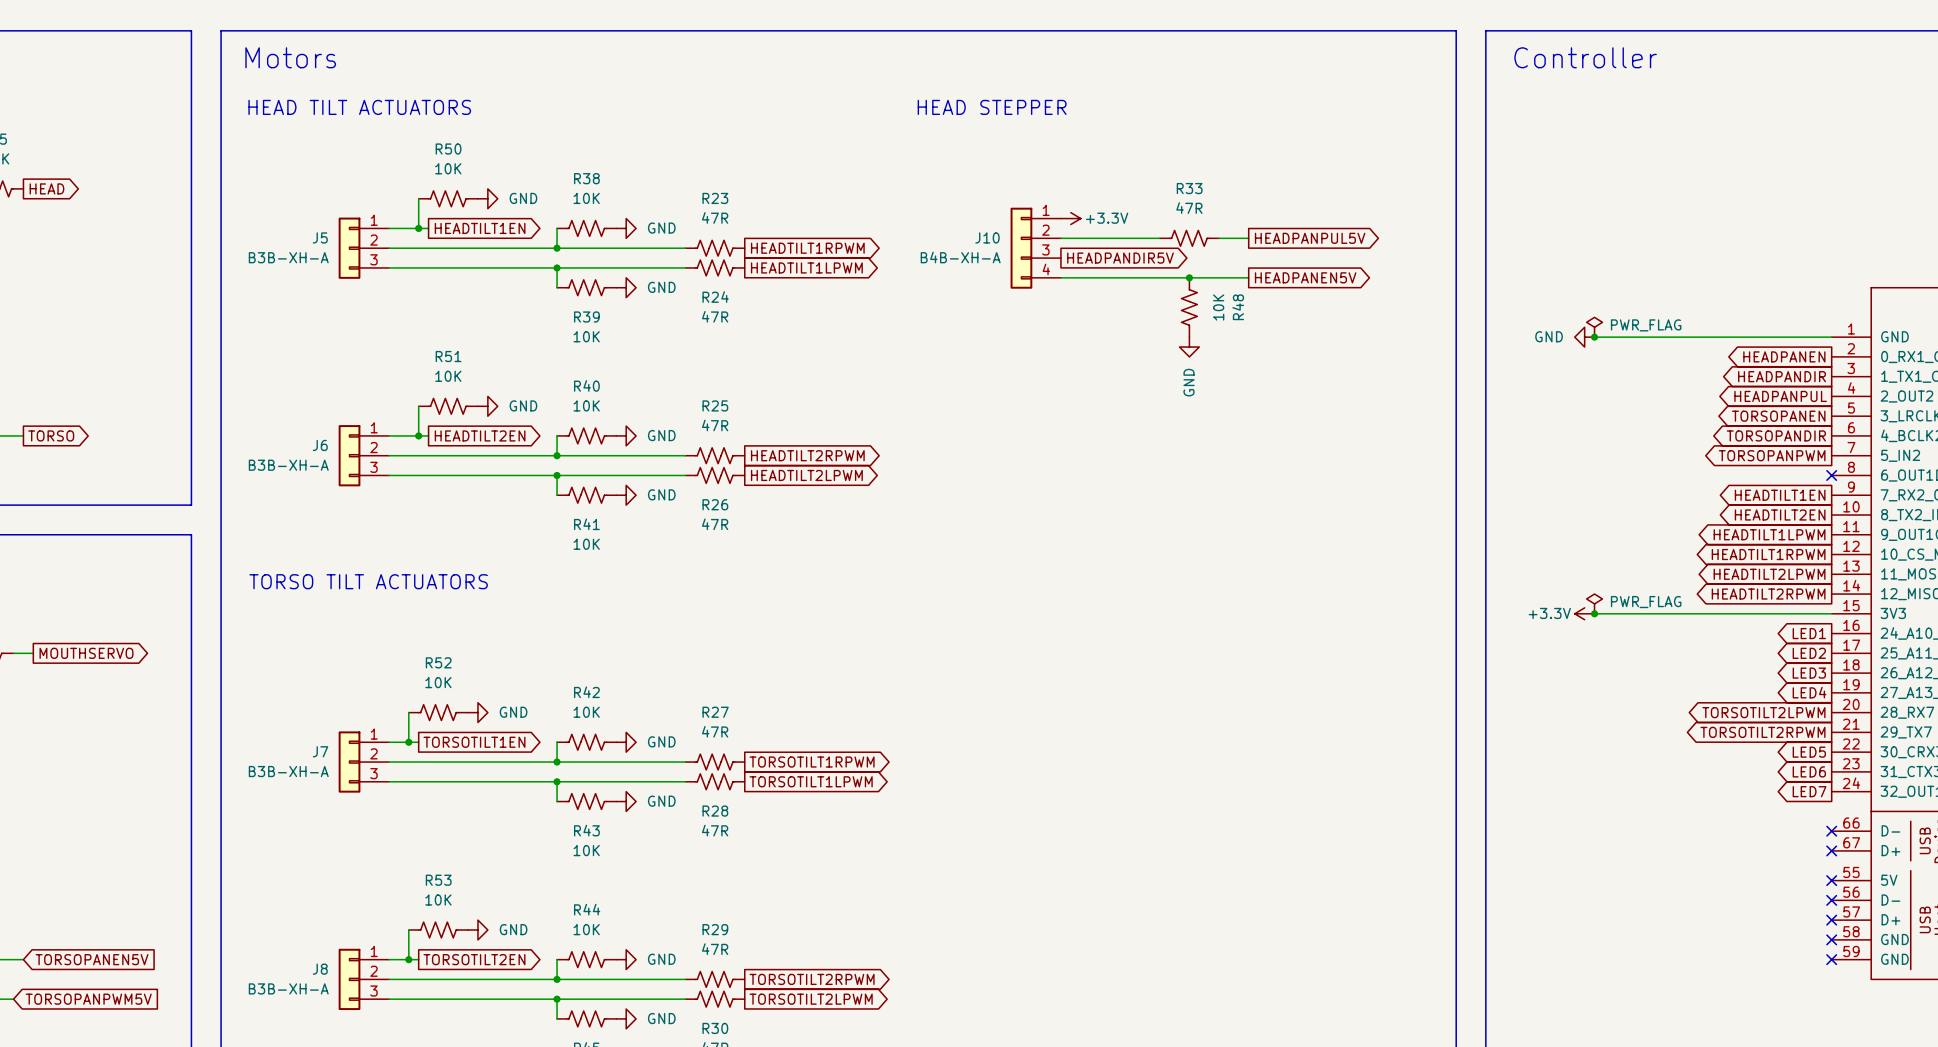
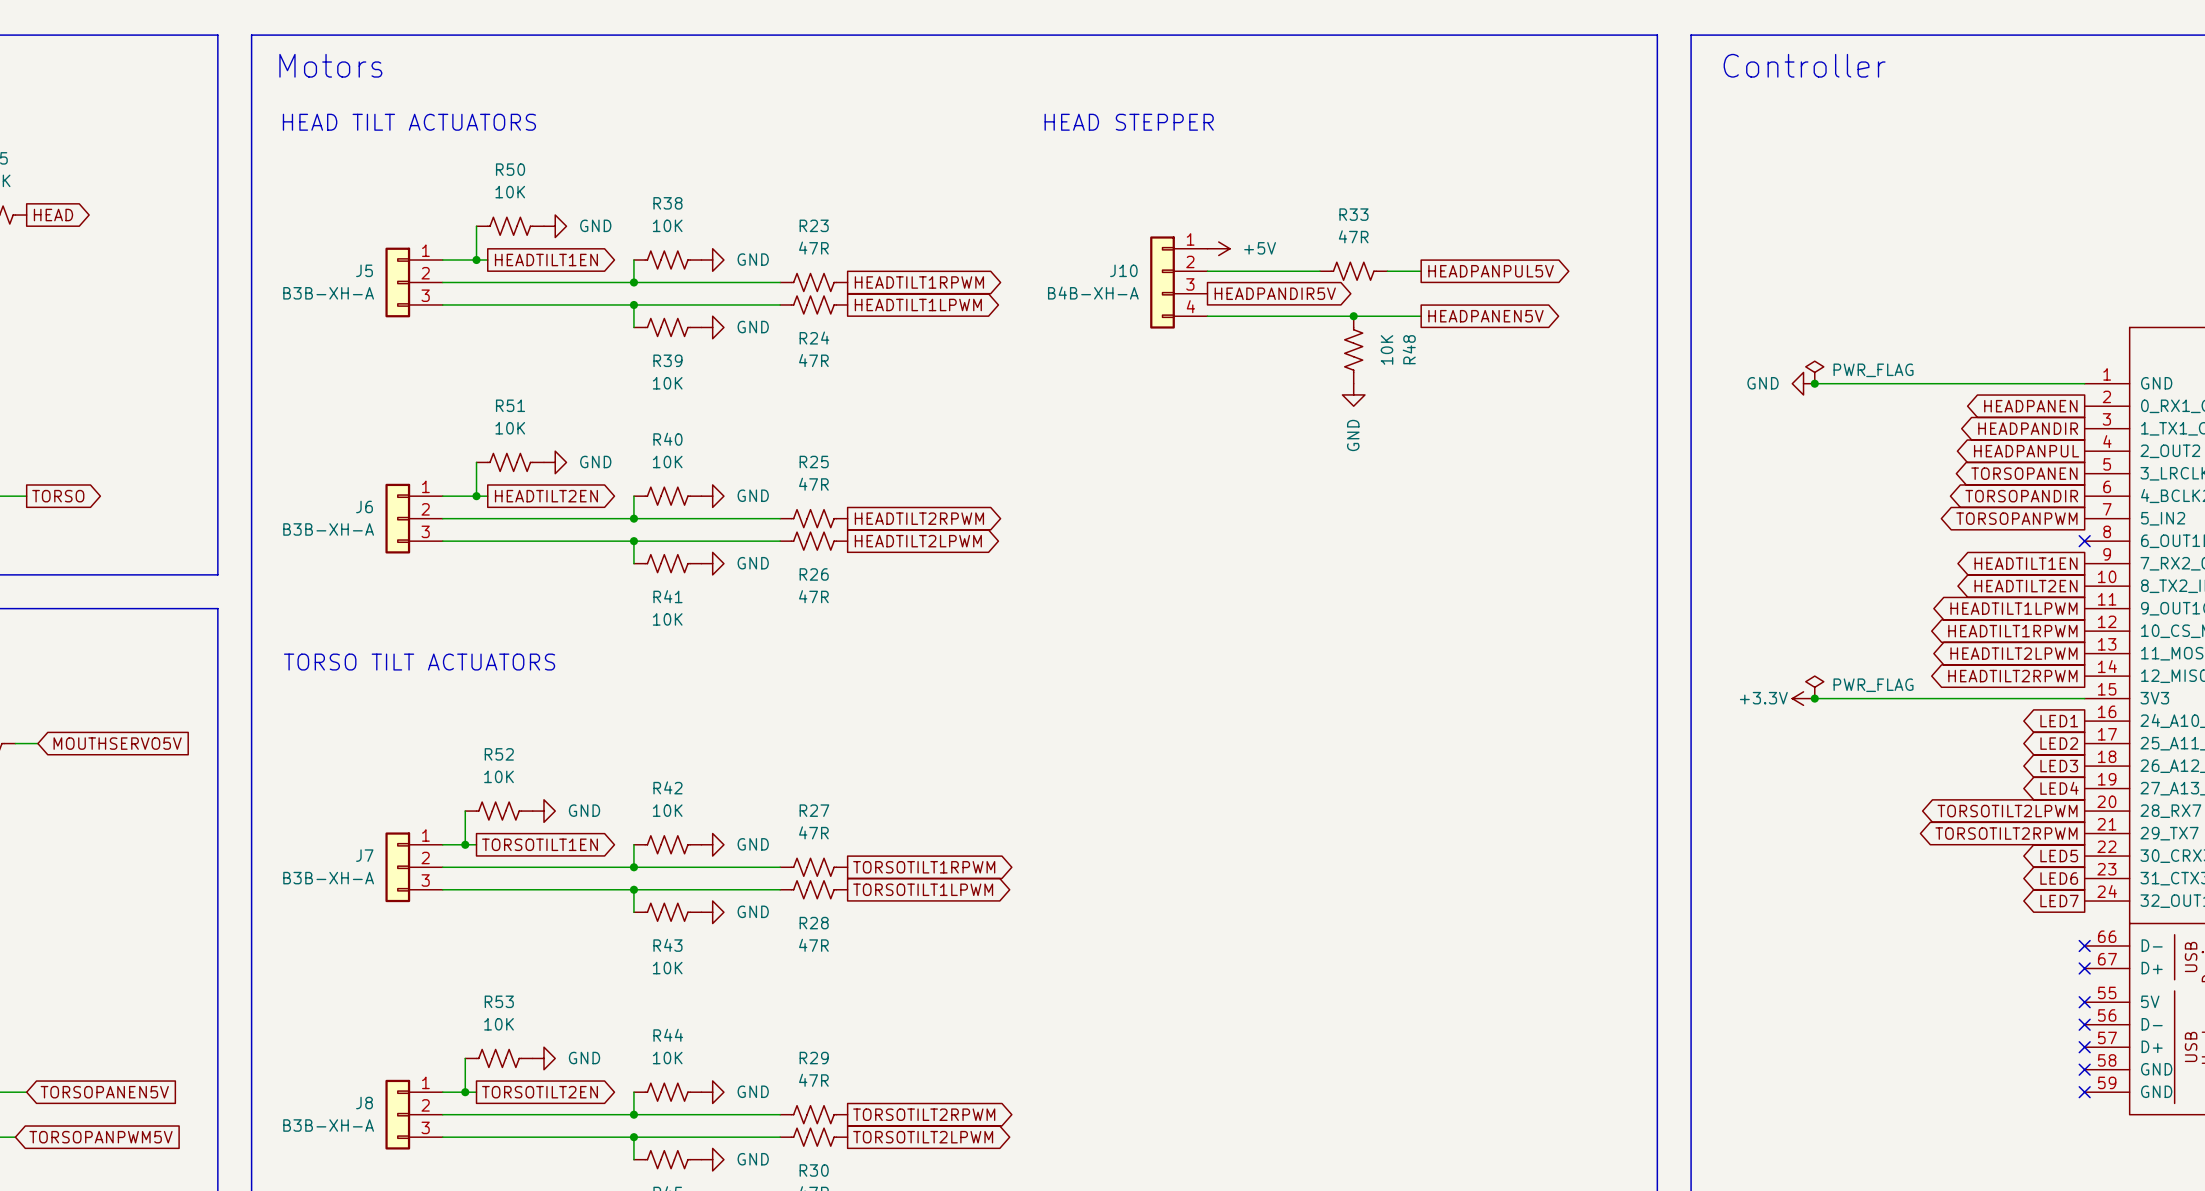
power symbol: +3.3V (1070, 218) -> +5V (1218, 248)
global label shape: output (86, 653) -> input (117, 743)
global label: MOUTHSERVO (86, 653) -> MOUTHSERVO5V (117, 743)

